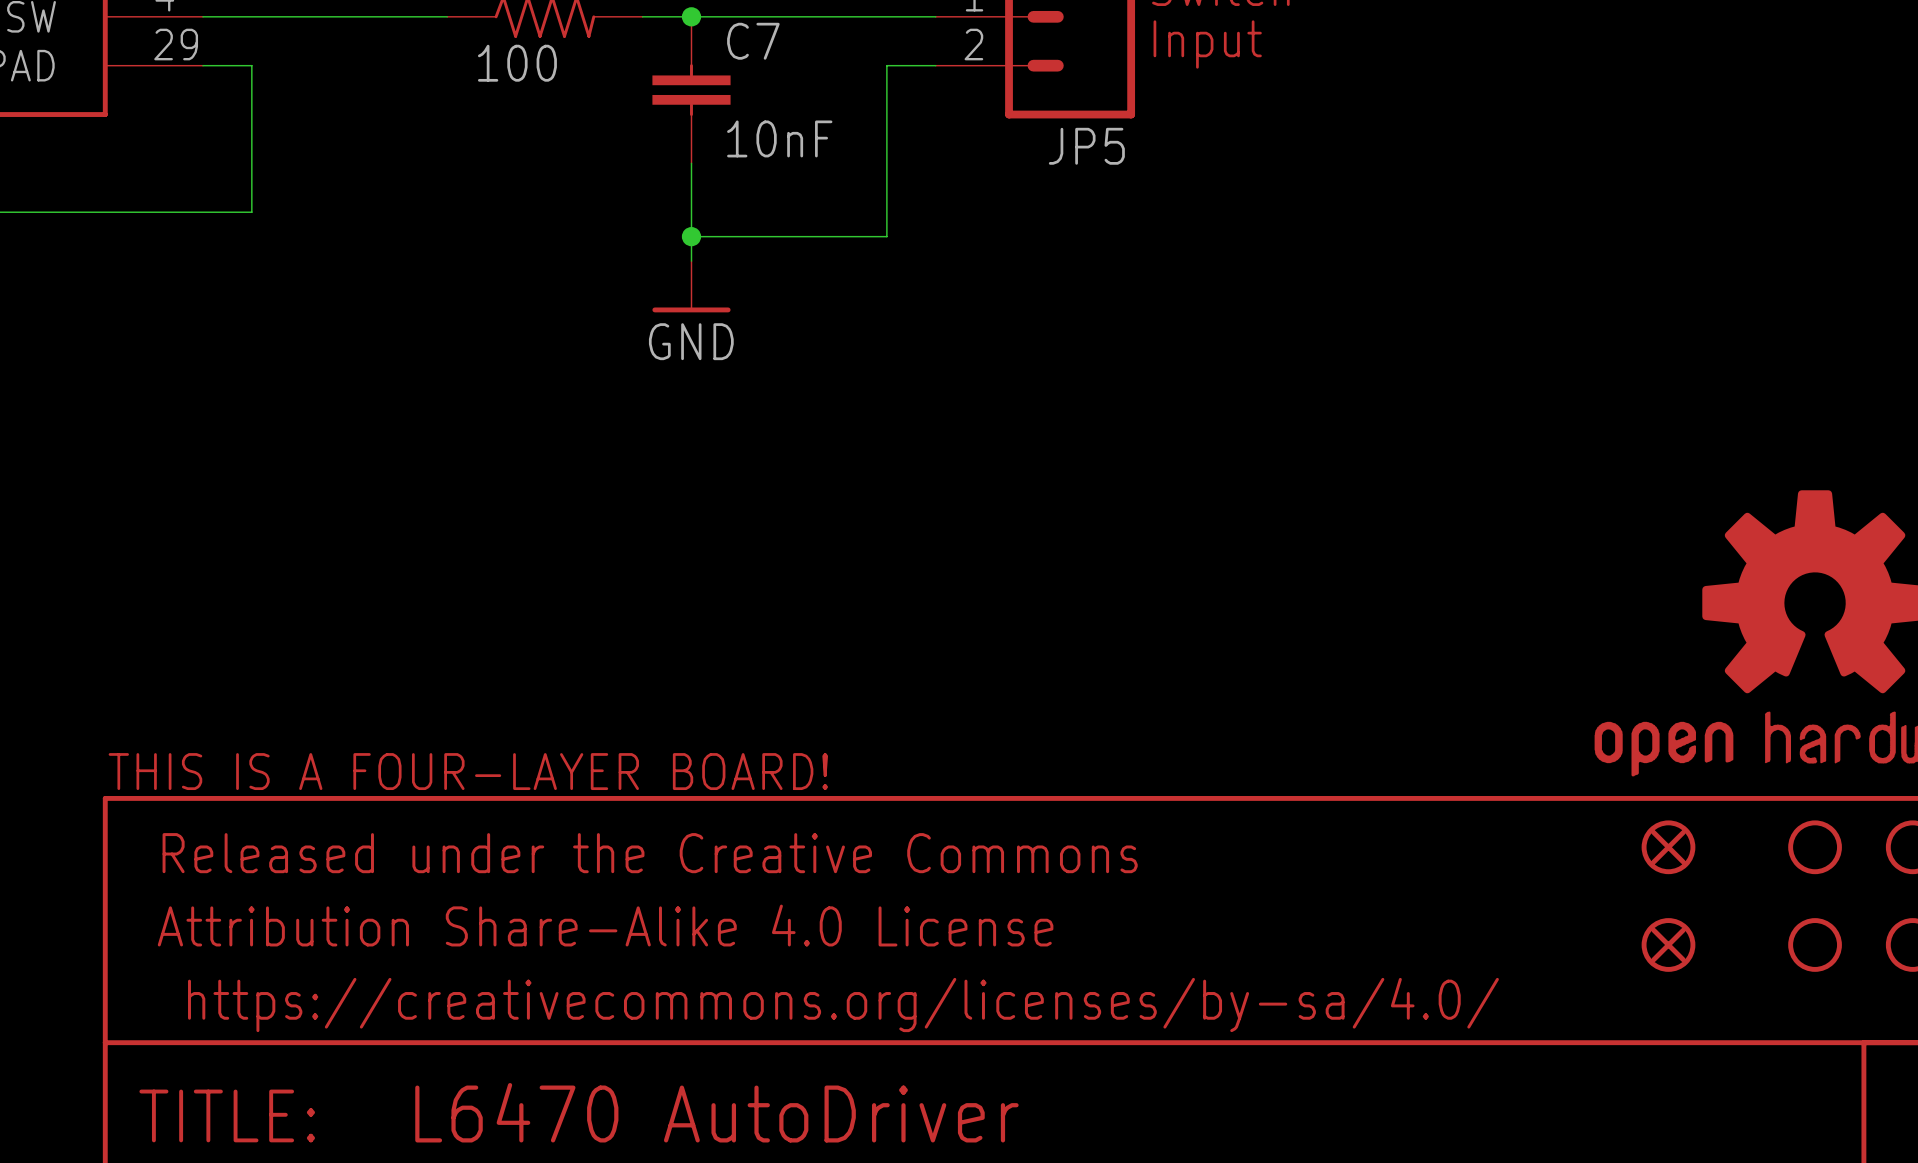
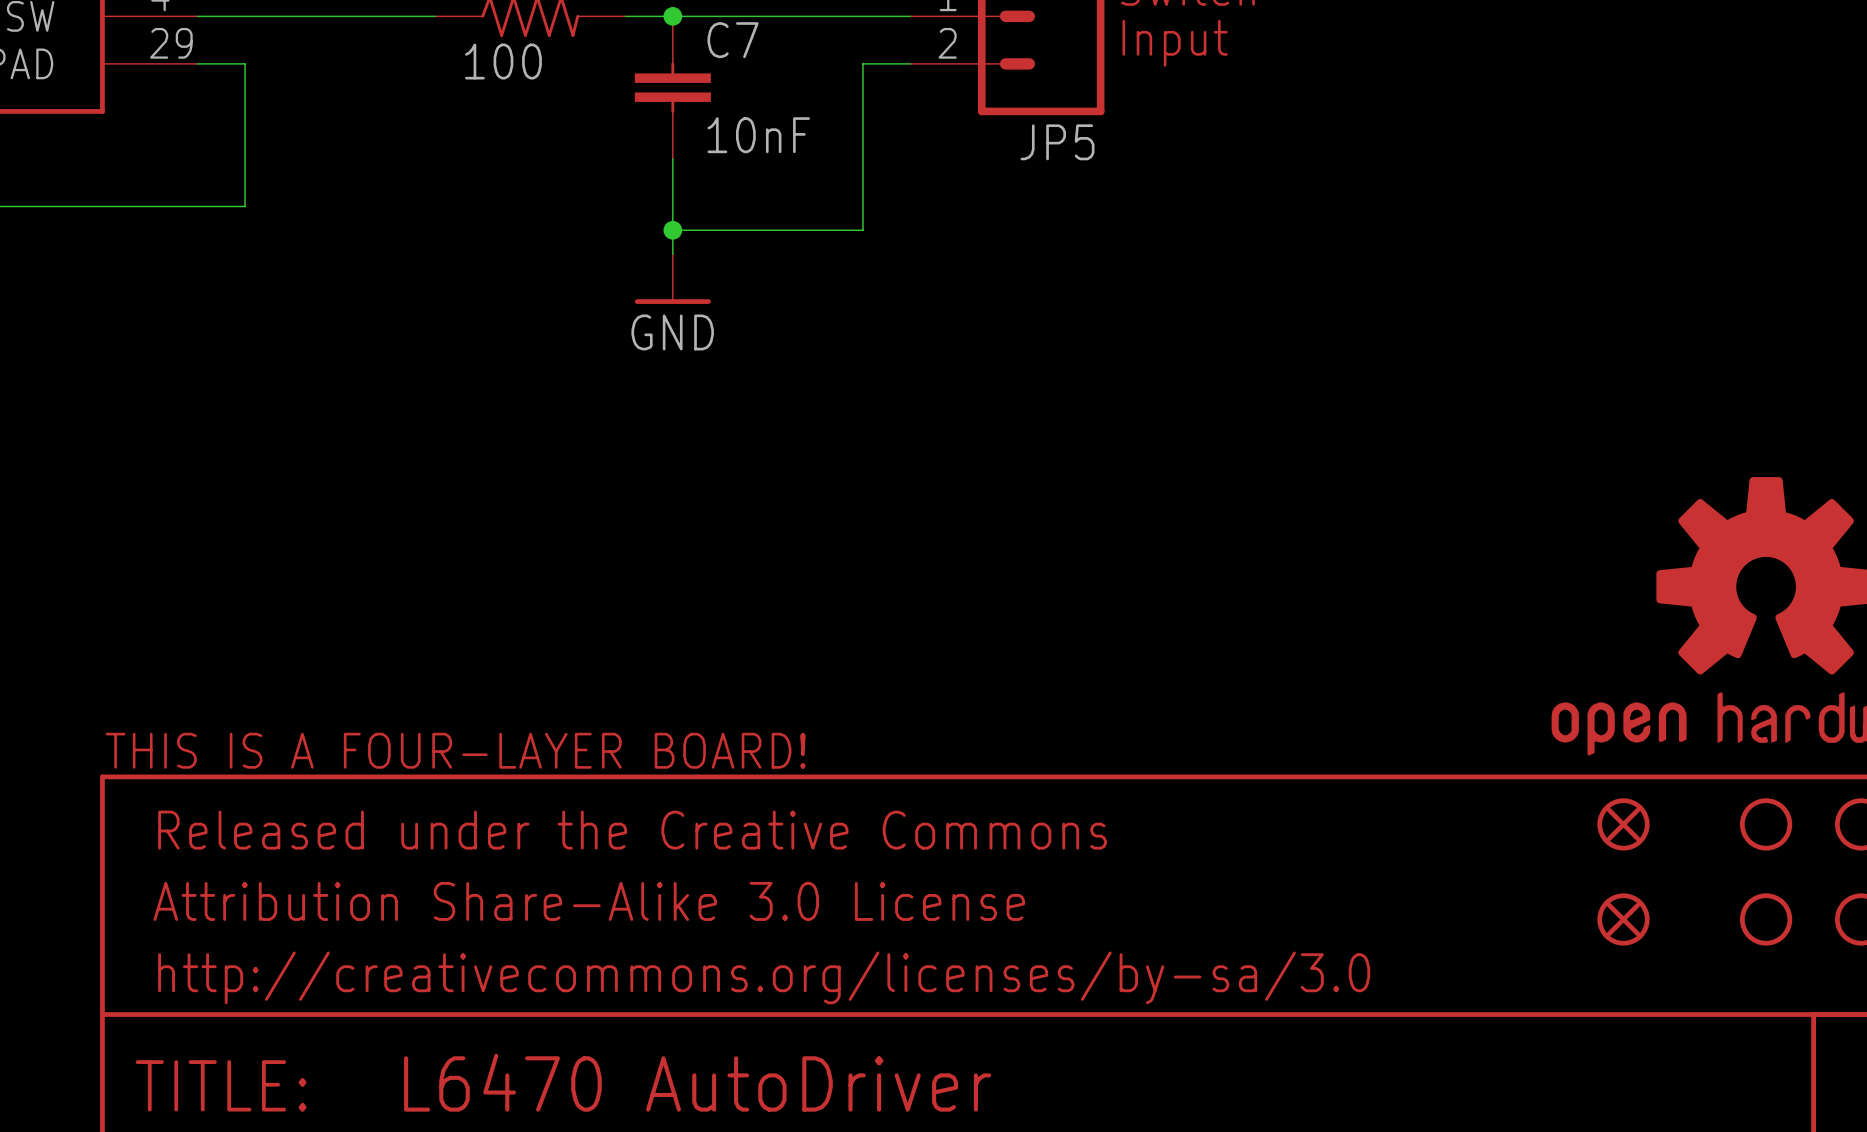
part text: Attribution Share-Alike 4.0 License (605, 925) -> Attribution Share-Alike 3.0 License (589, 901)
part text: https://creativecommons.org/licenses/by-sa/4.0/ (843, 1005) -> http://creativecommons.org/licenses/by-sa/3.0 (764, 977)

